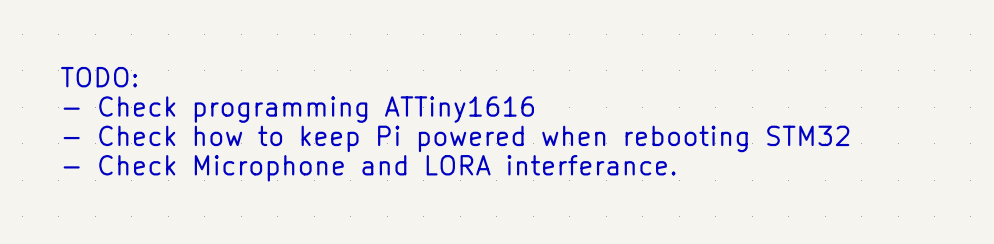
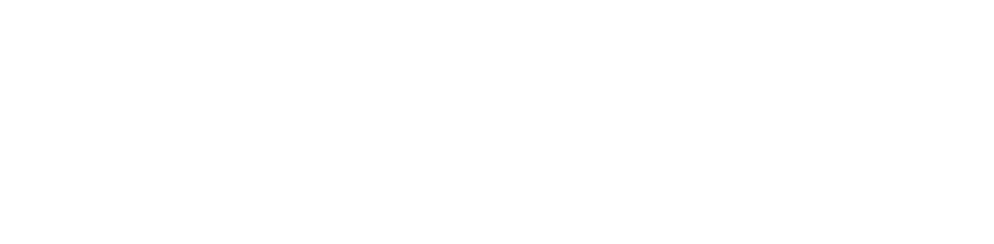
text: TODO: (99, 77) -> none
text: - Check programming ATTiny1616 (298, 109) -> none
text: - Check how to keep Pi powered when rebooting STM32 (456, 138) -> none
text: - Check Microphone and LORA interferance. (369, 168) -> none

